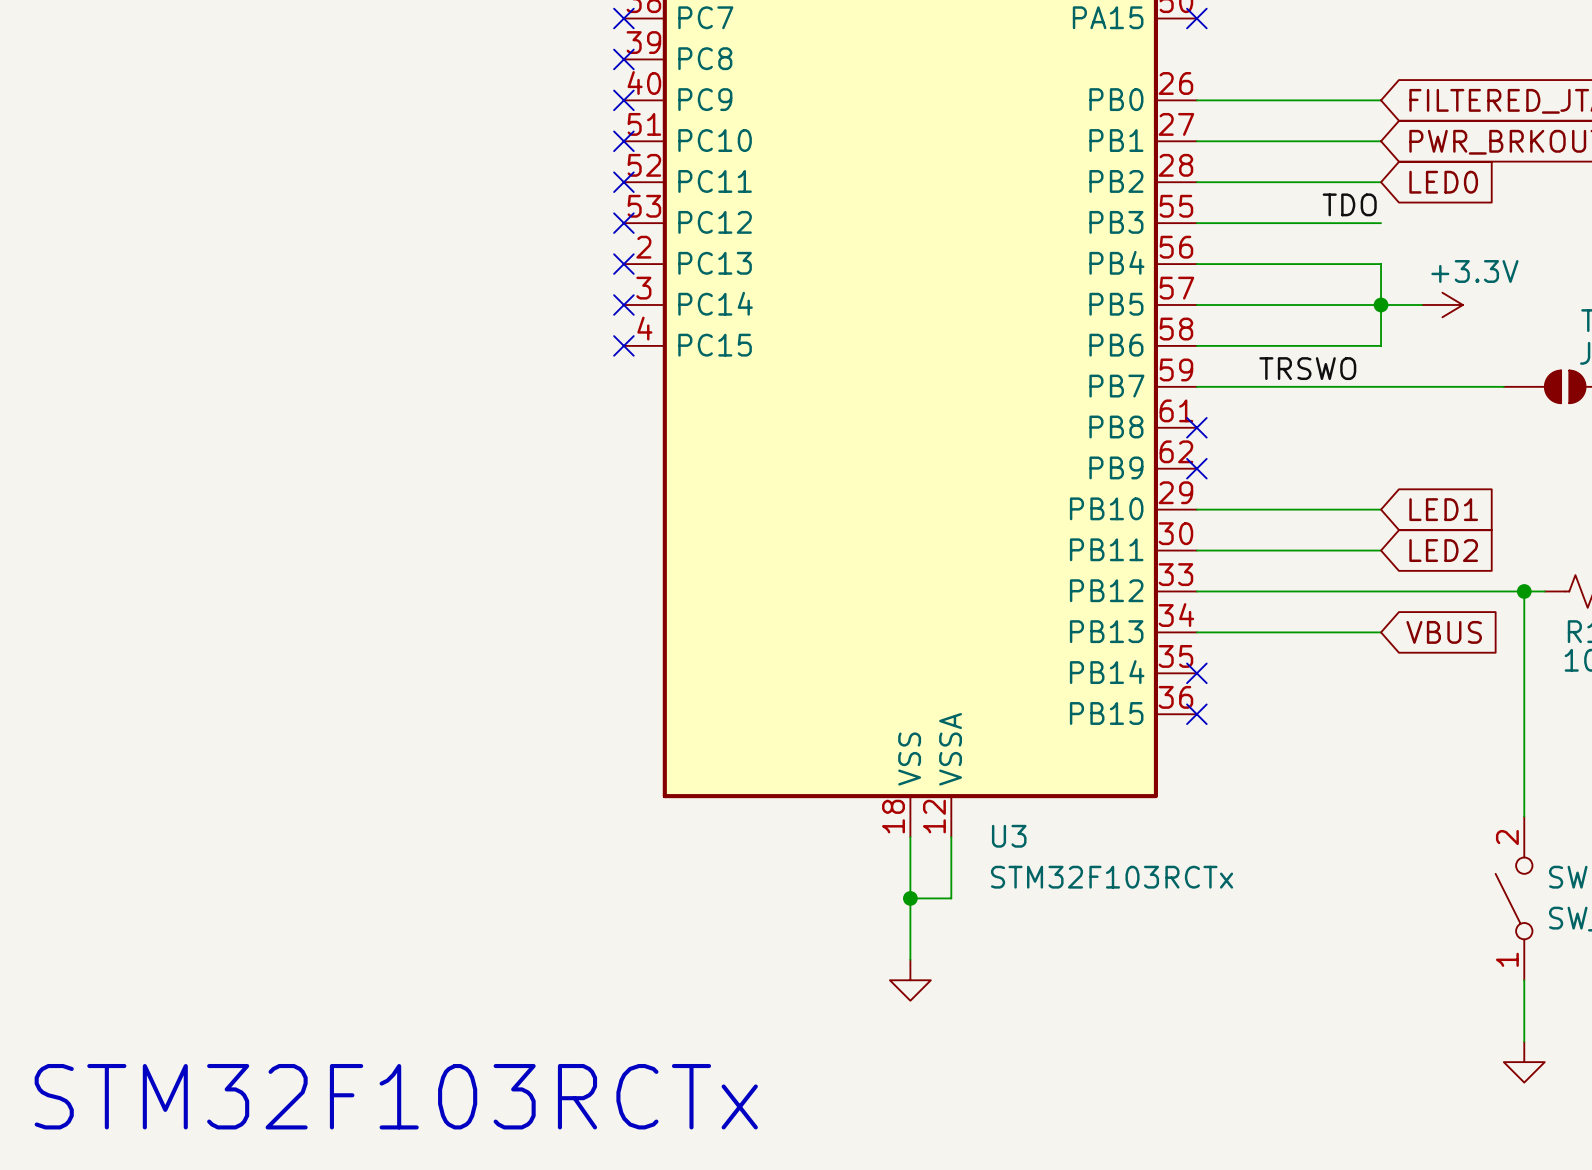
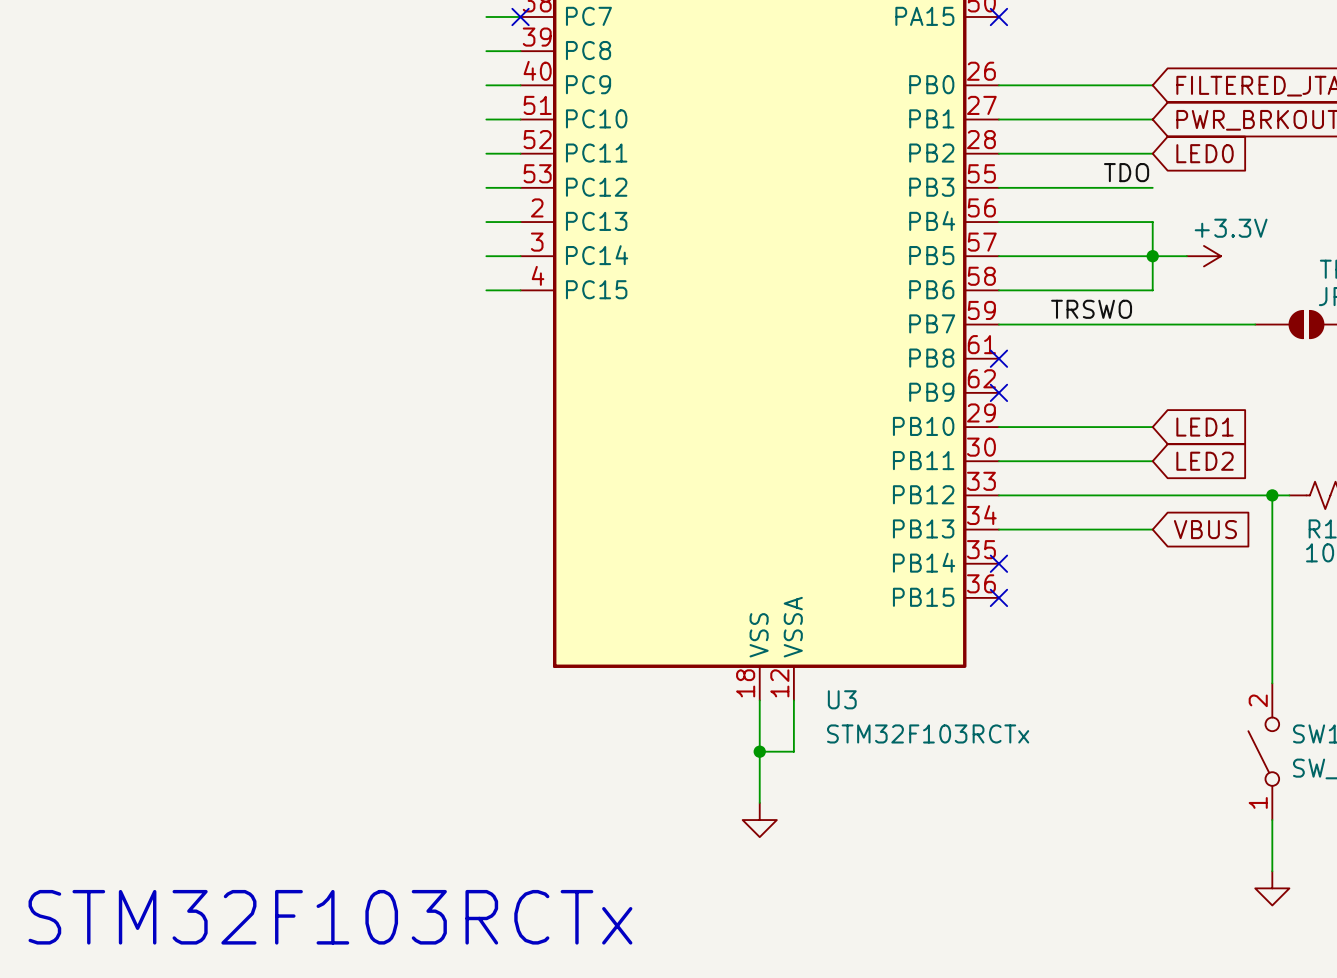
wire: none -> (486, 16) (520, 16)
wire: none -> (486, 51) (520, 51)
no-connect mark: (623, 59) -> none
wire: none -> (486, 85) (520, 85)
no-connect mark: (623, 100) -> none
wire: none -> (486, 119) (520, 119)
no-connect mark: (623, 141) -> none
wire: none -> (486, 153) (520, 153)
no-connect mark: (623, 182) -> none
wire: none -> (486, 187) (520, 187)
no-connect mark: (623, 223) -> none
wire: none -> (486, 222) (520, 222)
no-connect mark: (623, 264) -> none
wire: none -> (486, 256) (520, 256)
no-connect mark: (623, 304) -> none
wire: none -> (486, 290) (520, 290)
no-connect mark: (623, 345) -> none

